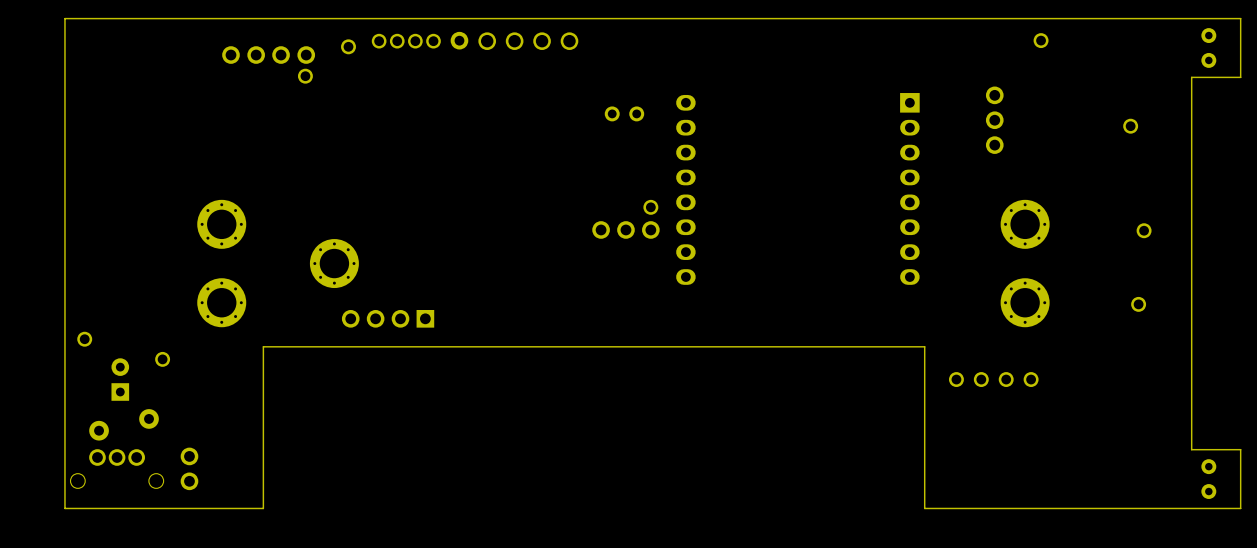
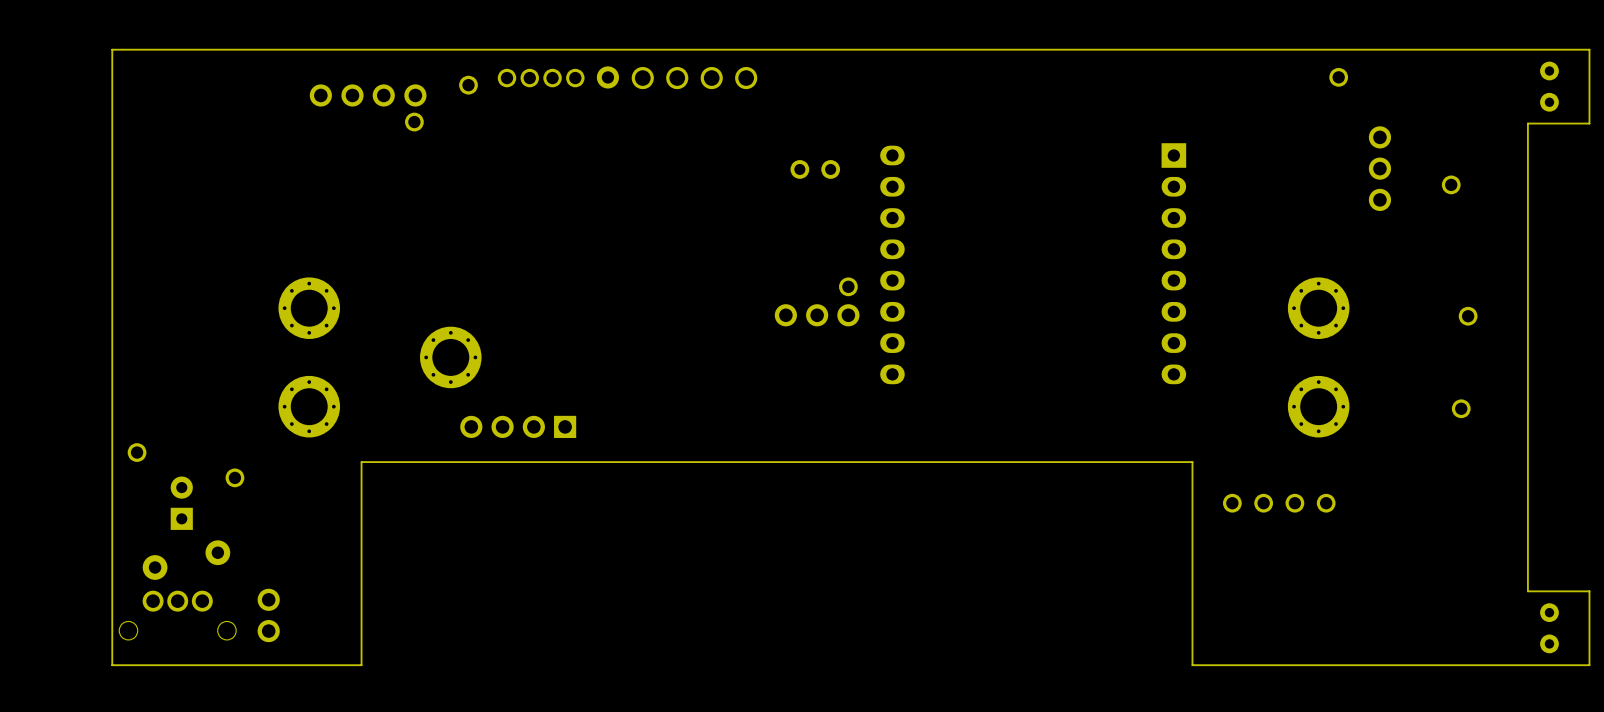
part position: (994, 120) -> (1379, 168)

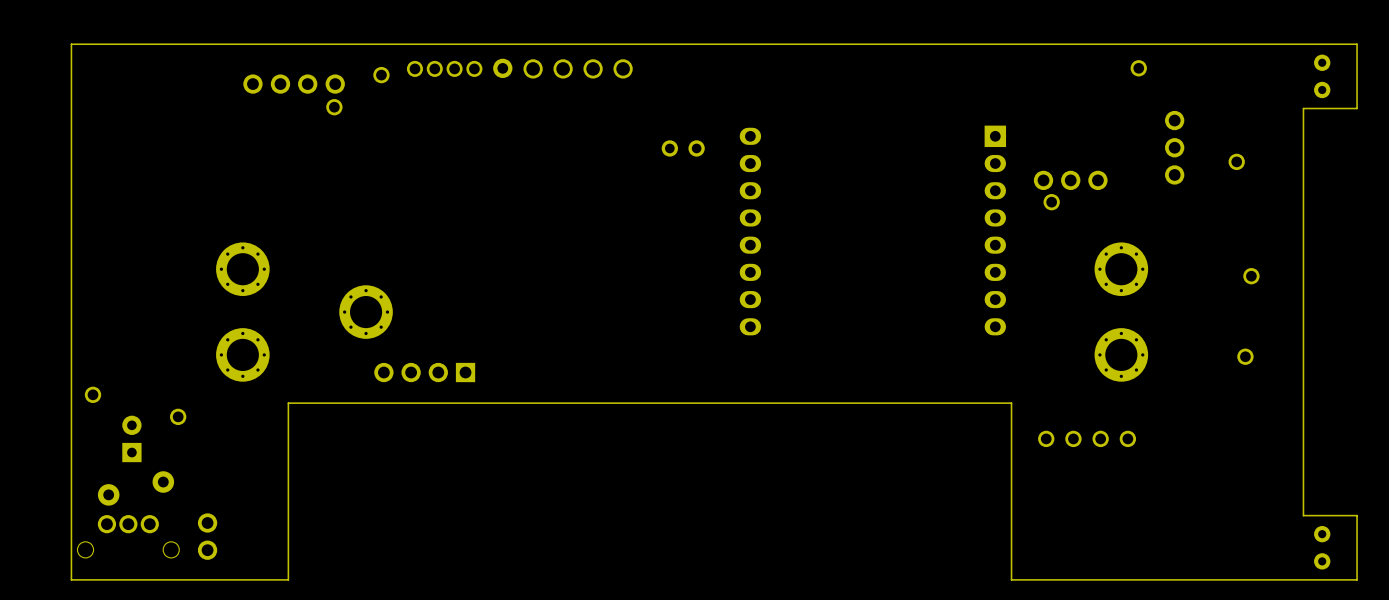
part: none -> (1070, 180)
part: none -> (1051, 202)
part: (848, 286) -> none
part: (817, 315) -> none

